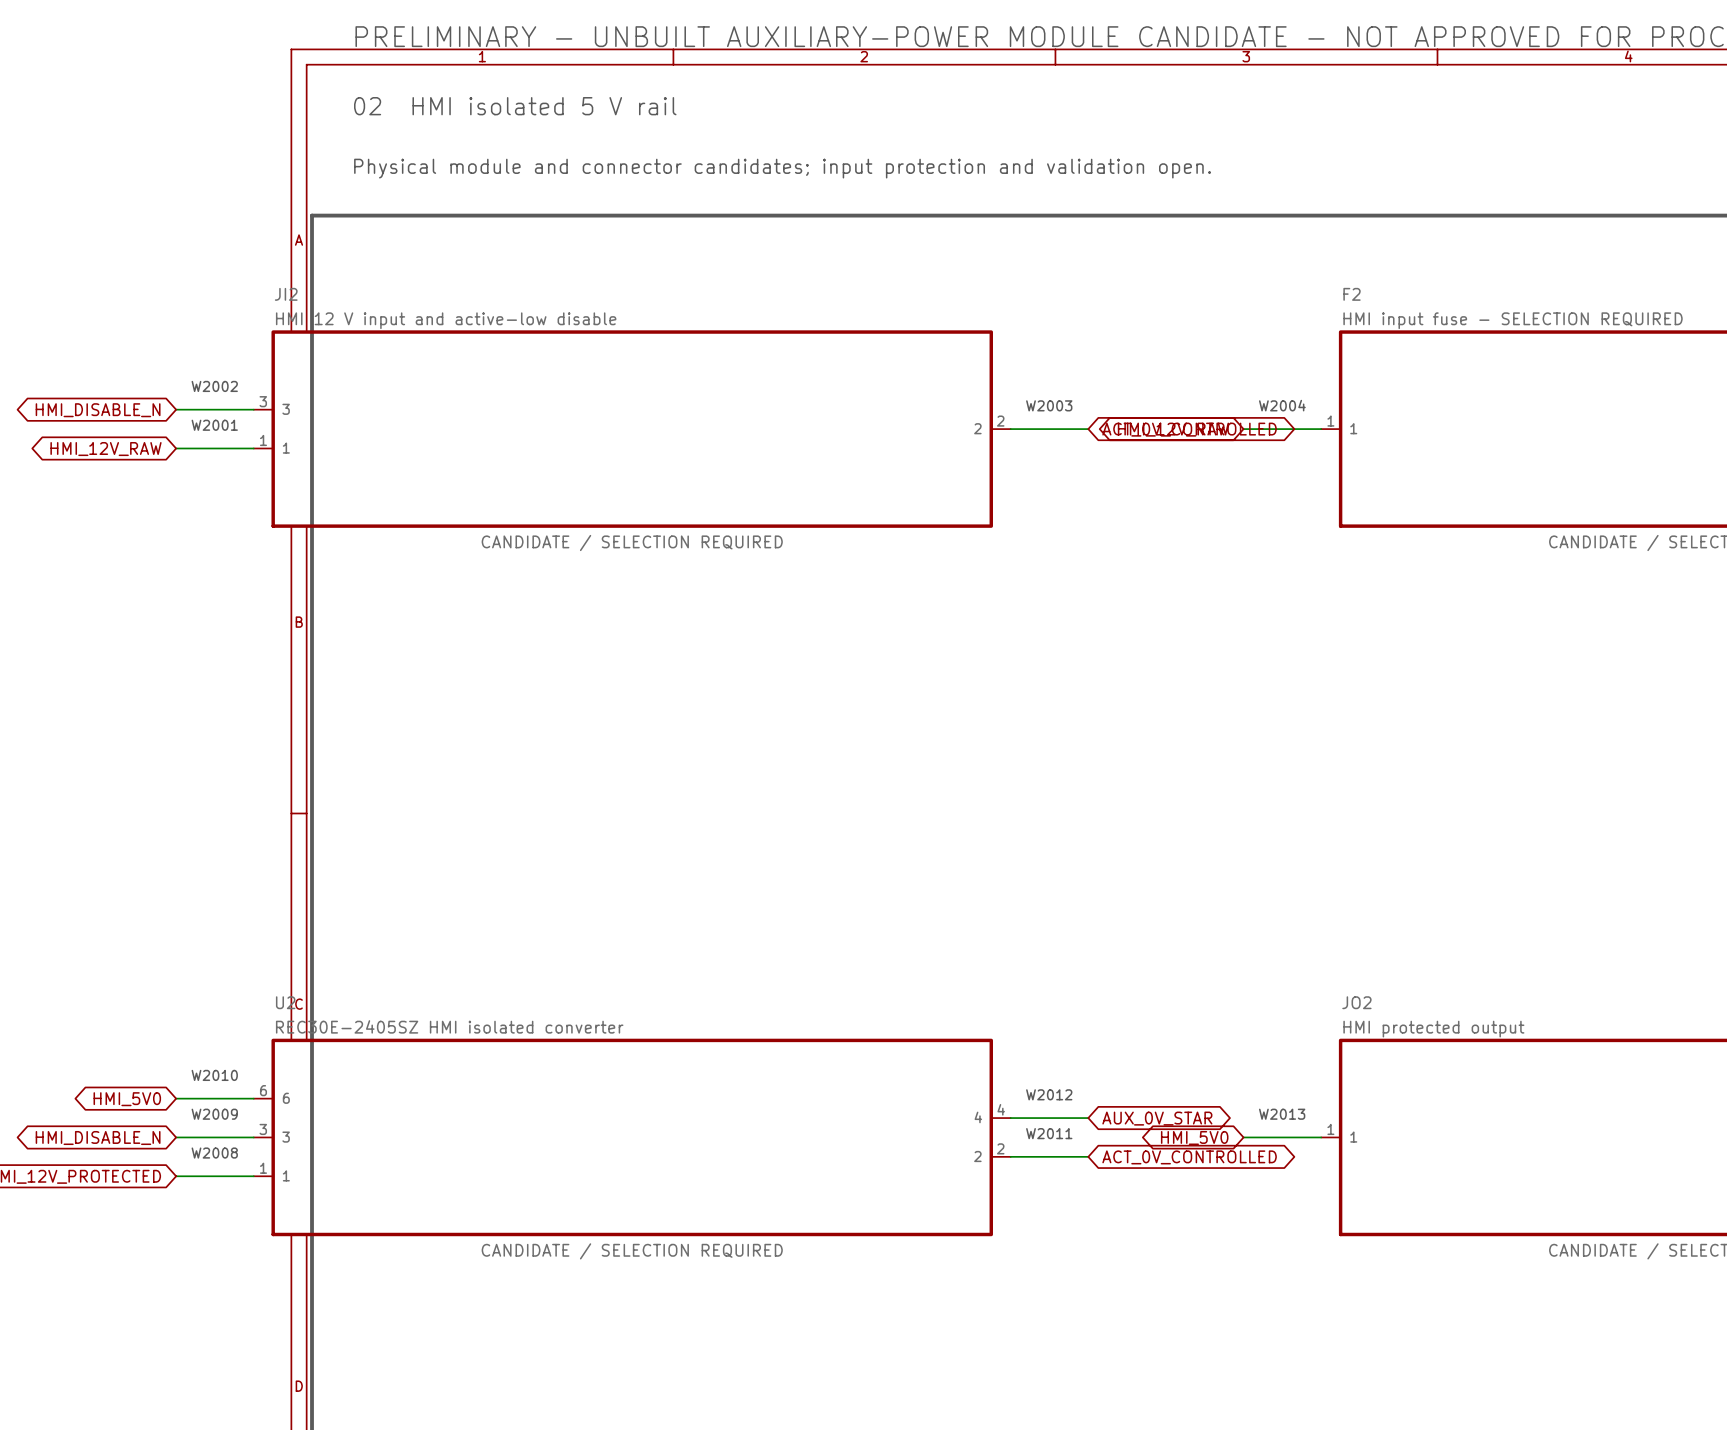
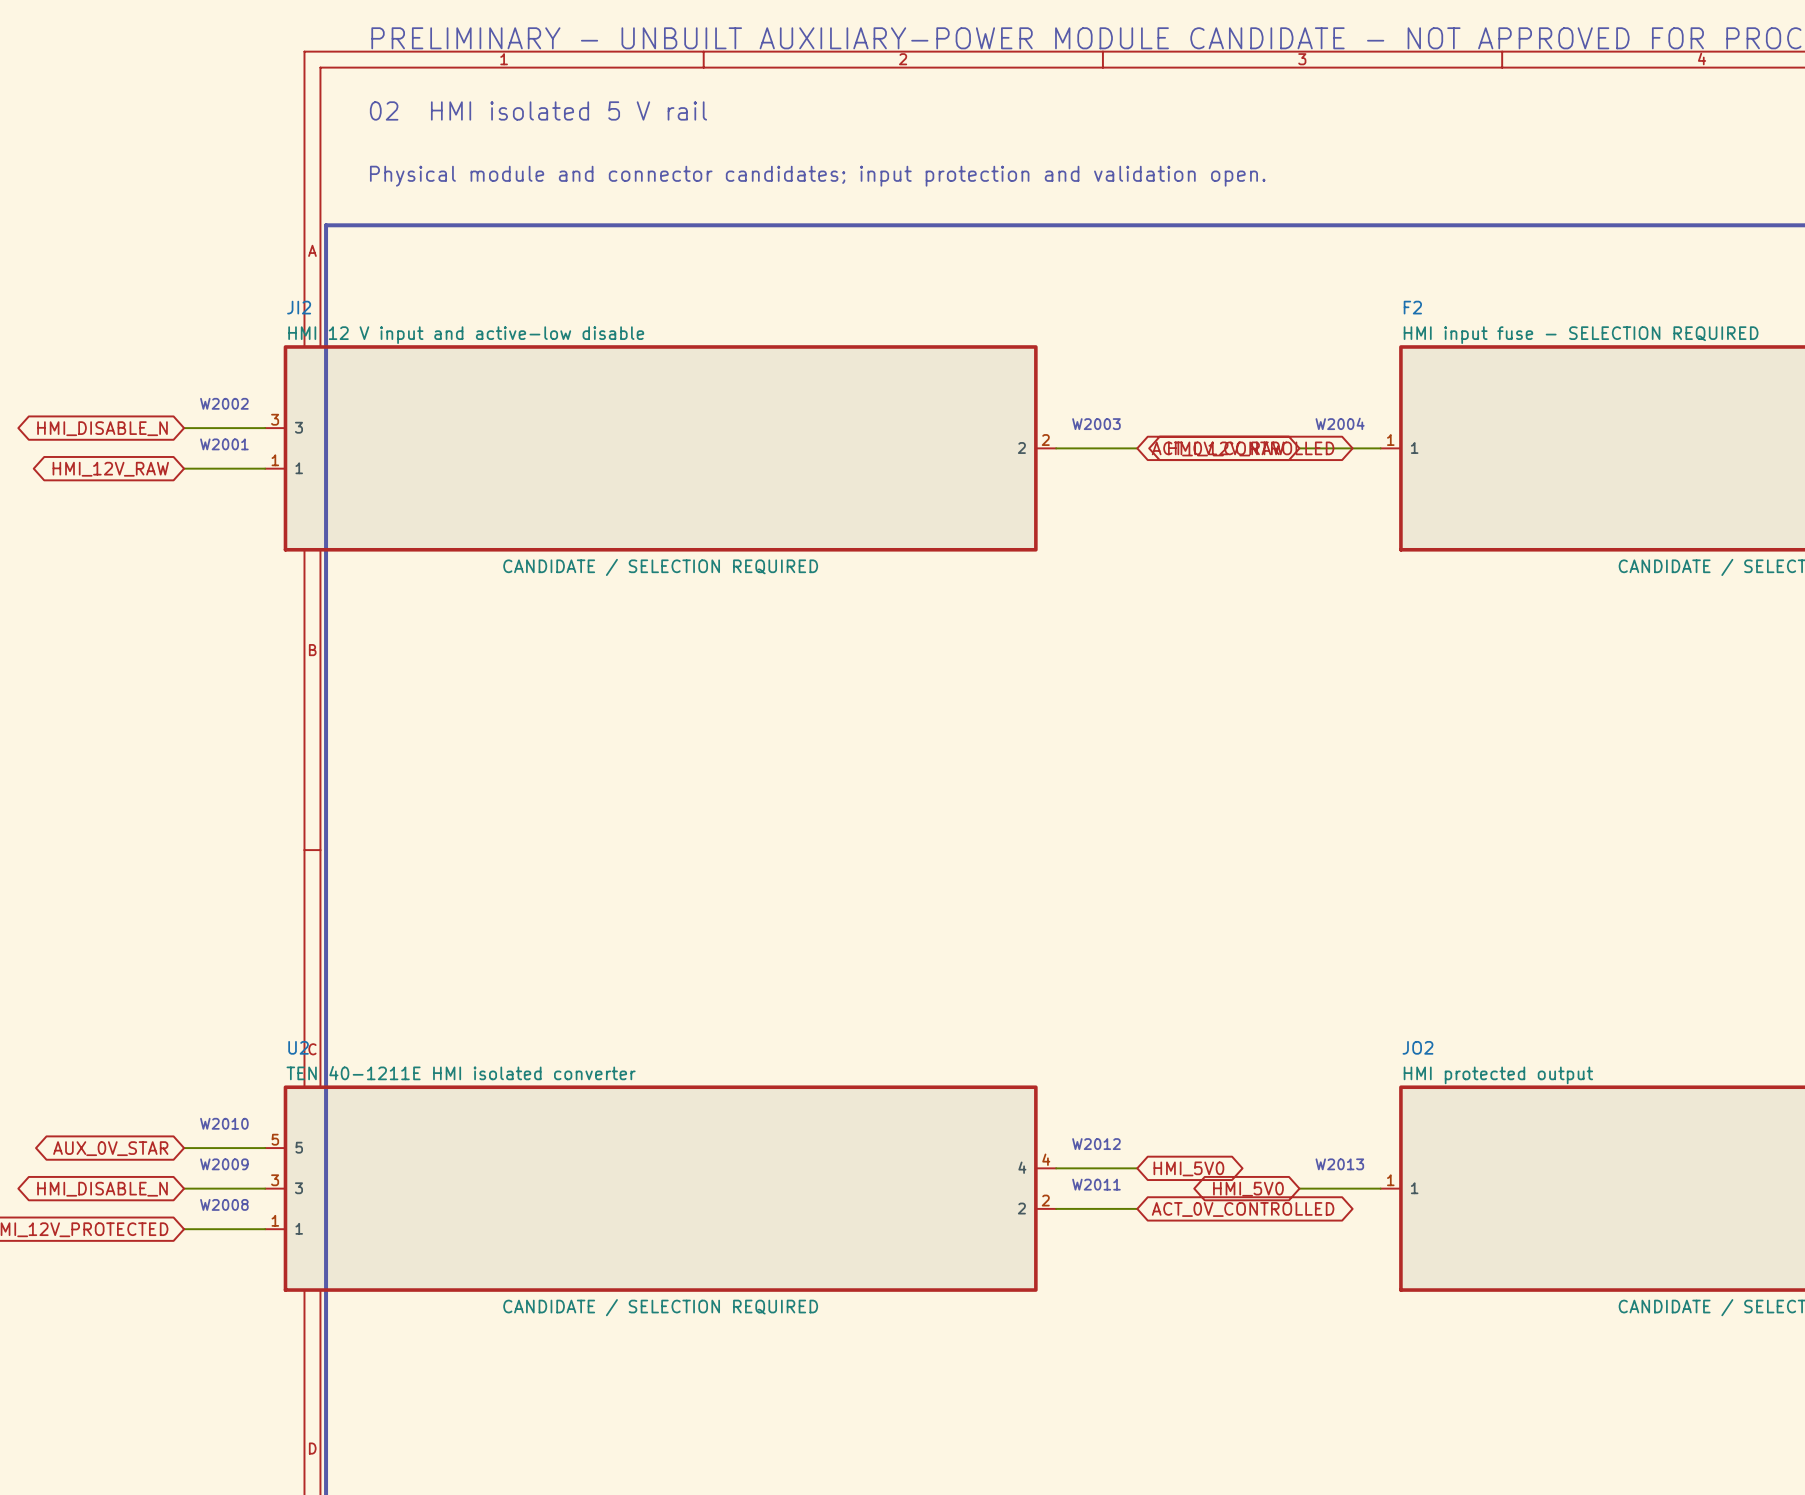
U2 text: REC30E-2405SZ HMI isolated converter (449, 1026) -> TEN 40-1211E HMI isolated converter (461, 1073)
U2 pin number: 6 (263, 1090) -> 5 (275, 1139)
U2 pin name: 6 (286, 1098) -> 5 (299, 1147)
global label: HMI_5V0 (127, 1099) -> AUX_0V_STAR (110, 1148)
global label: AUX_0V_STAR (1157, 1118) -> HMI_5V0 (1188, 1168)

